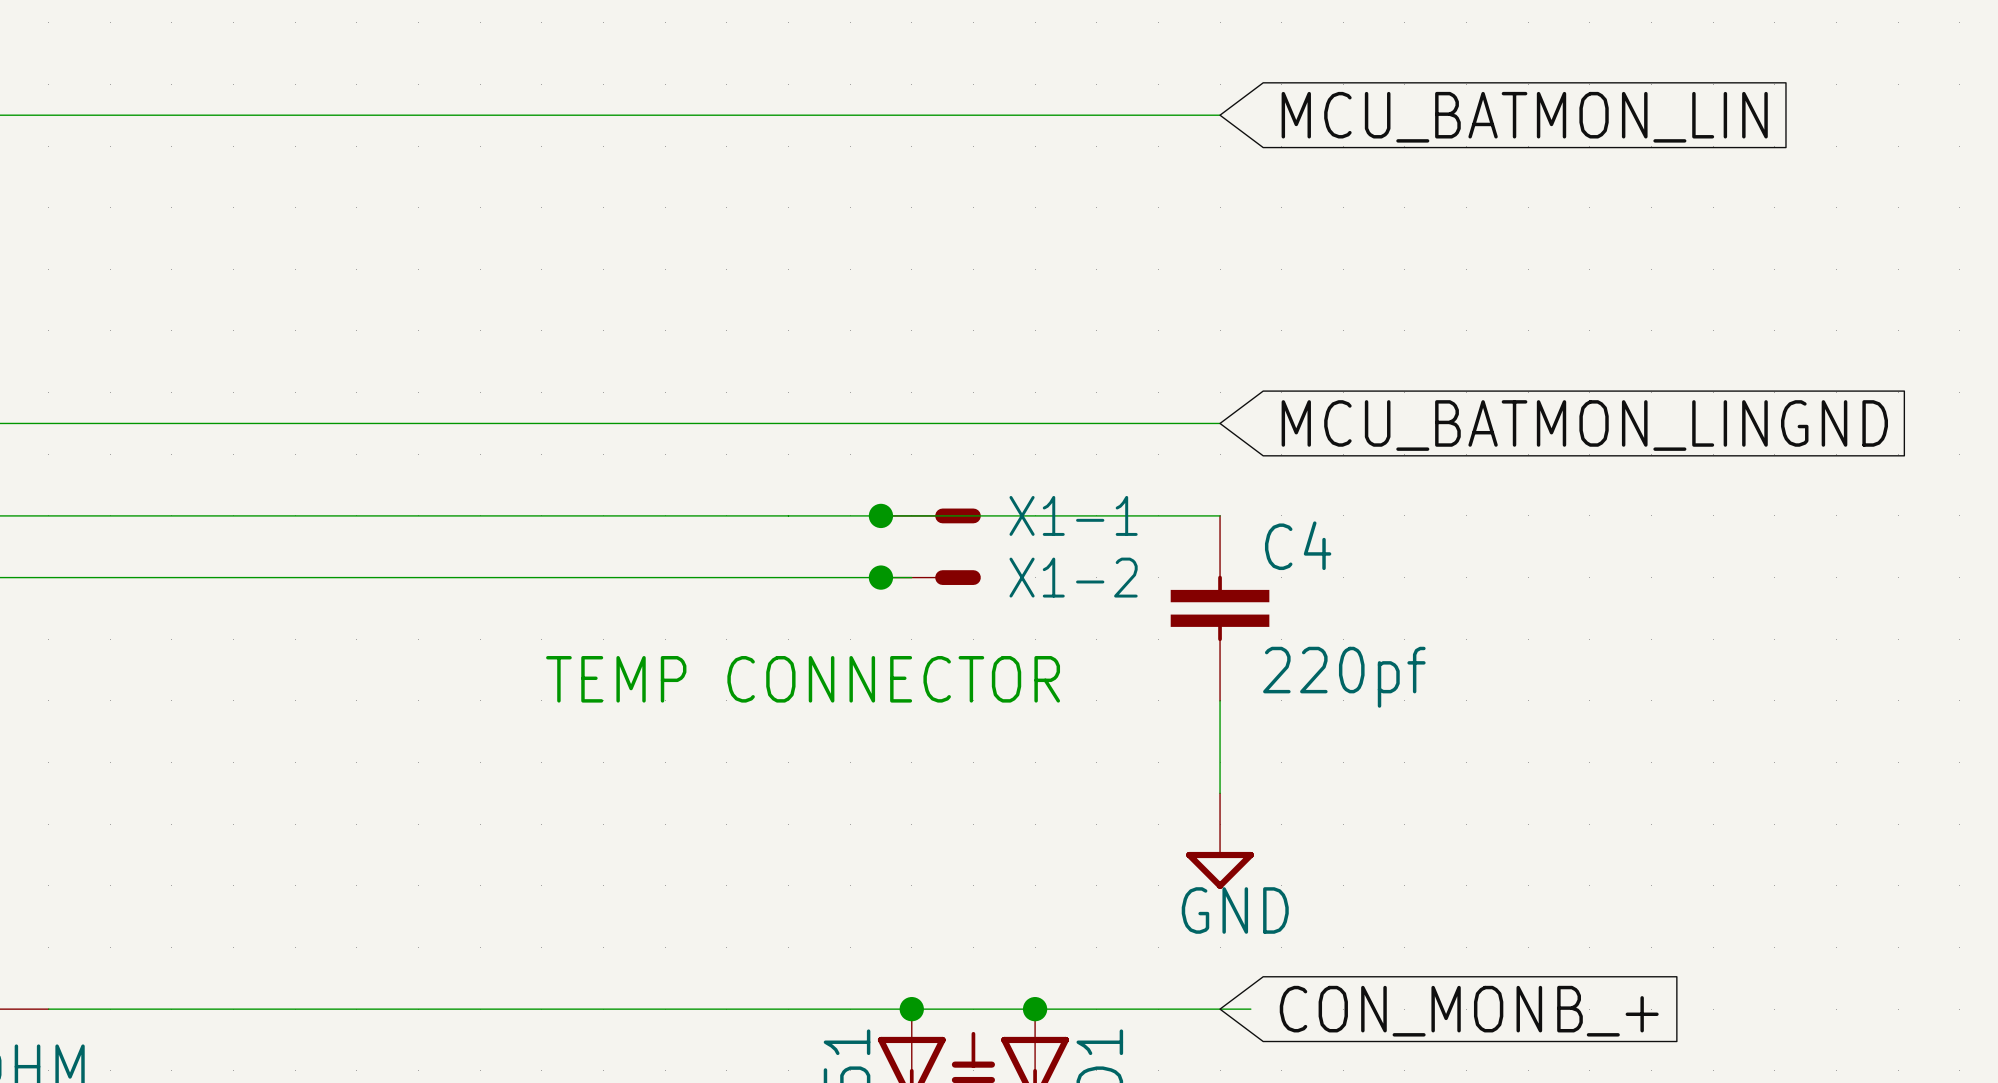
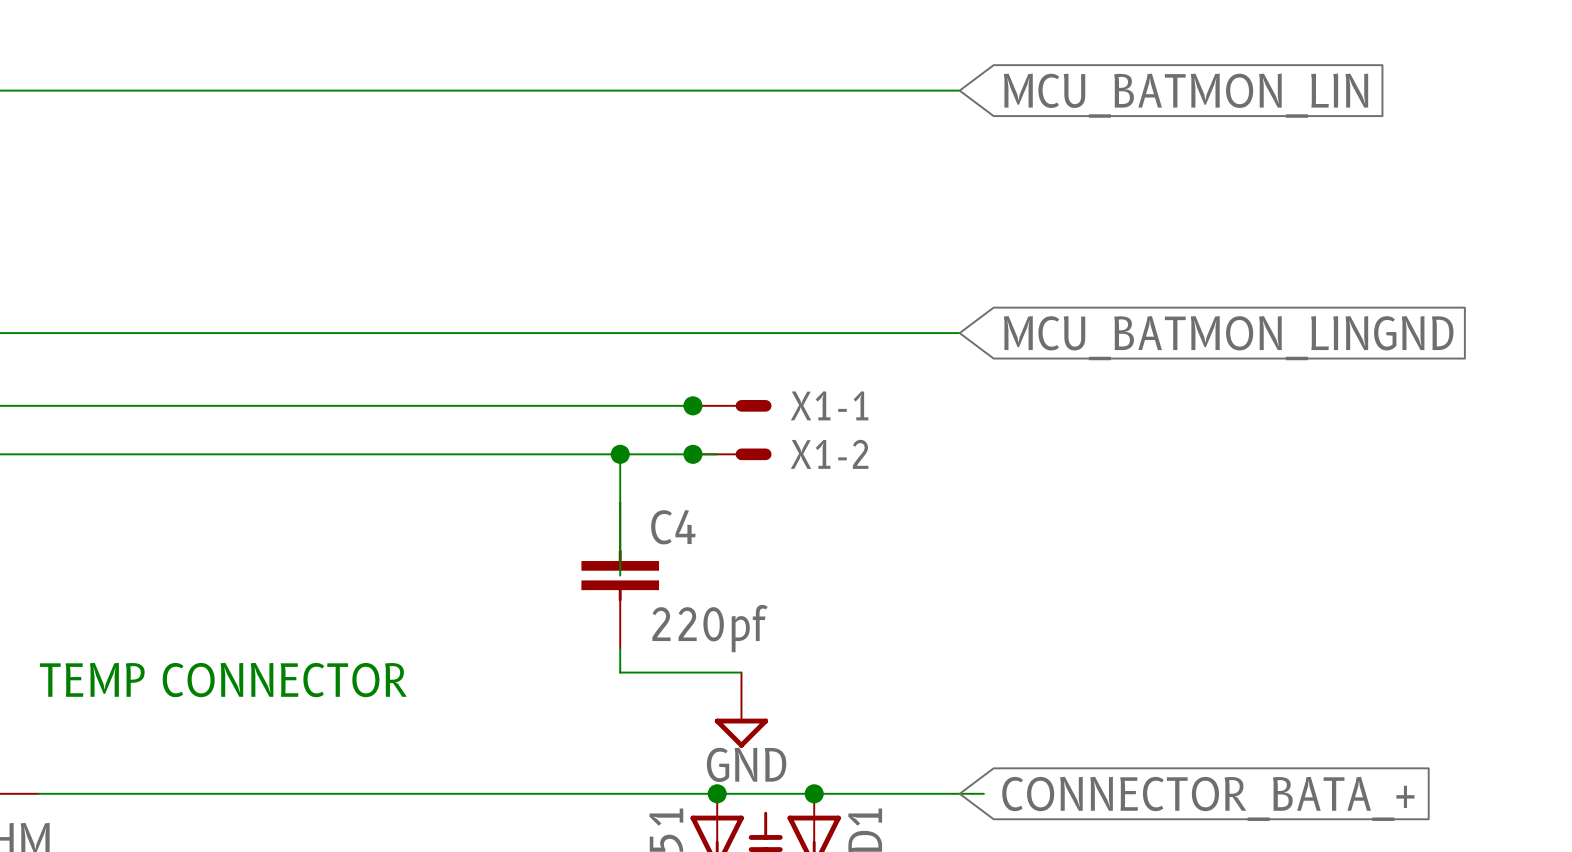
wire: (880, 515) (1220, 515) -> none
wire: none -> (620, 454) (620, 575)
junction: none -> (620, 454)
C4 position: (1220, 608) -> (620, 575)
text position: TEMP CONNECTOR (803, 679) -> TEMP CONNECTOR (223, 680)
wire: (1220, 700) (1220, 793) -> none
wire: none -> (620, 648) (620, 672) (741, 672)
power symbol position: GND (1220, 841) -> GND (741, 710)
global label: CON_MONB_+ (1469, 1011) -> CONNECTOR_BATA_+ (1208, 798)

